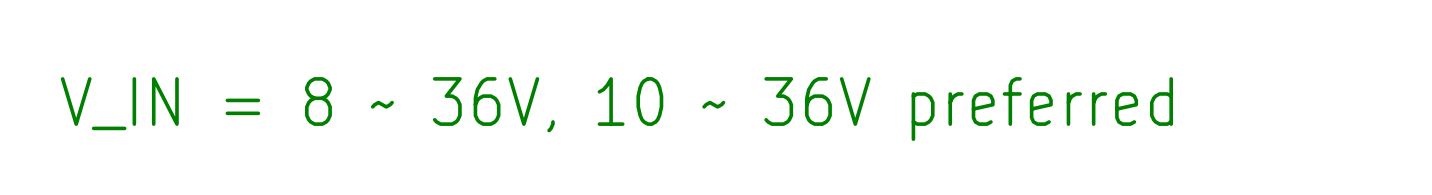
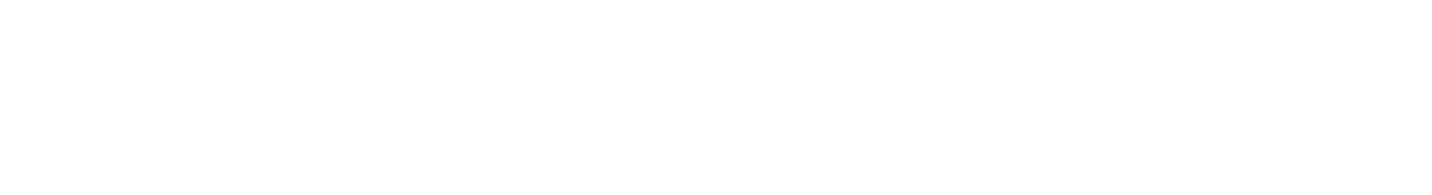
text: V_IN = 8 ~ 36V, 10 ~ 36V preferred (616, 109) -> none

